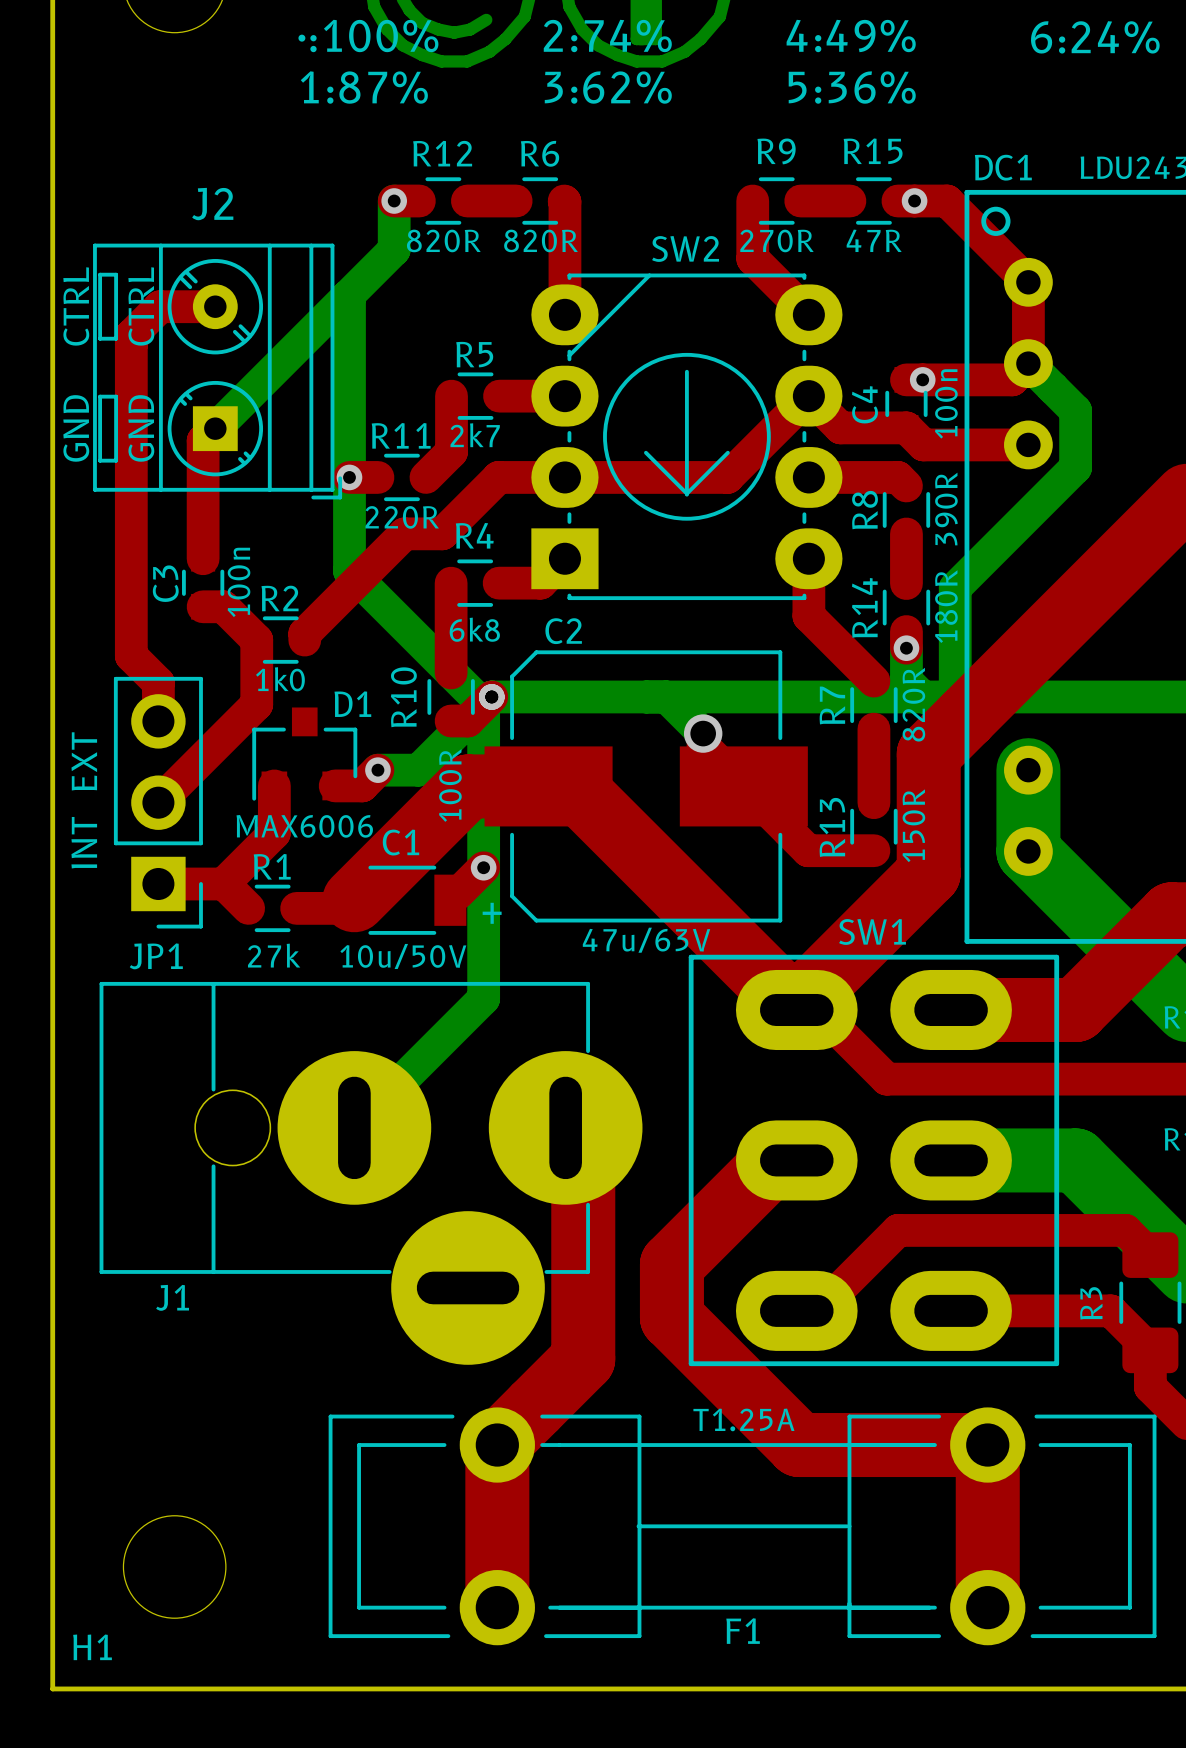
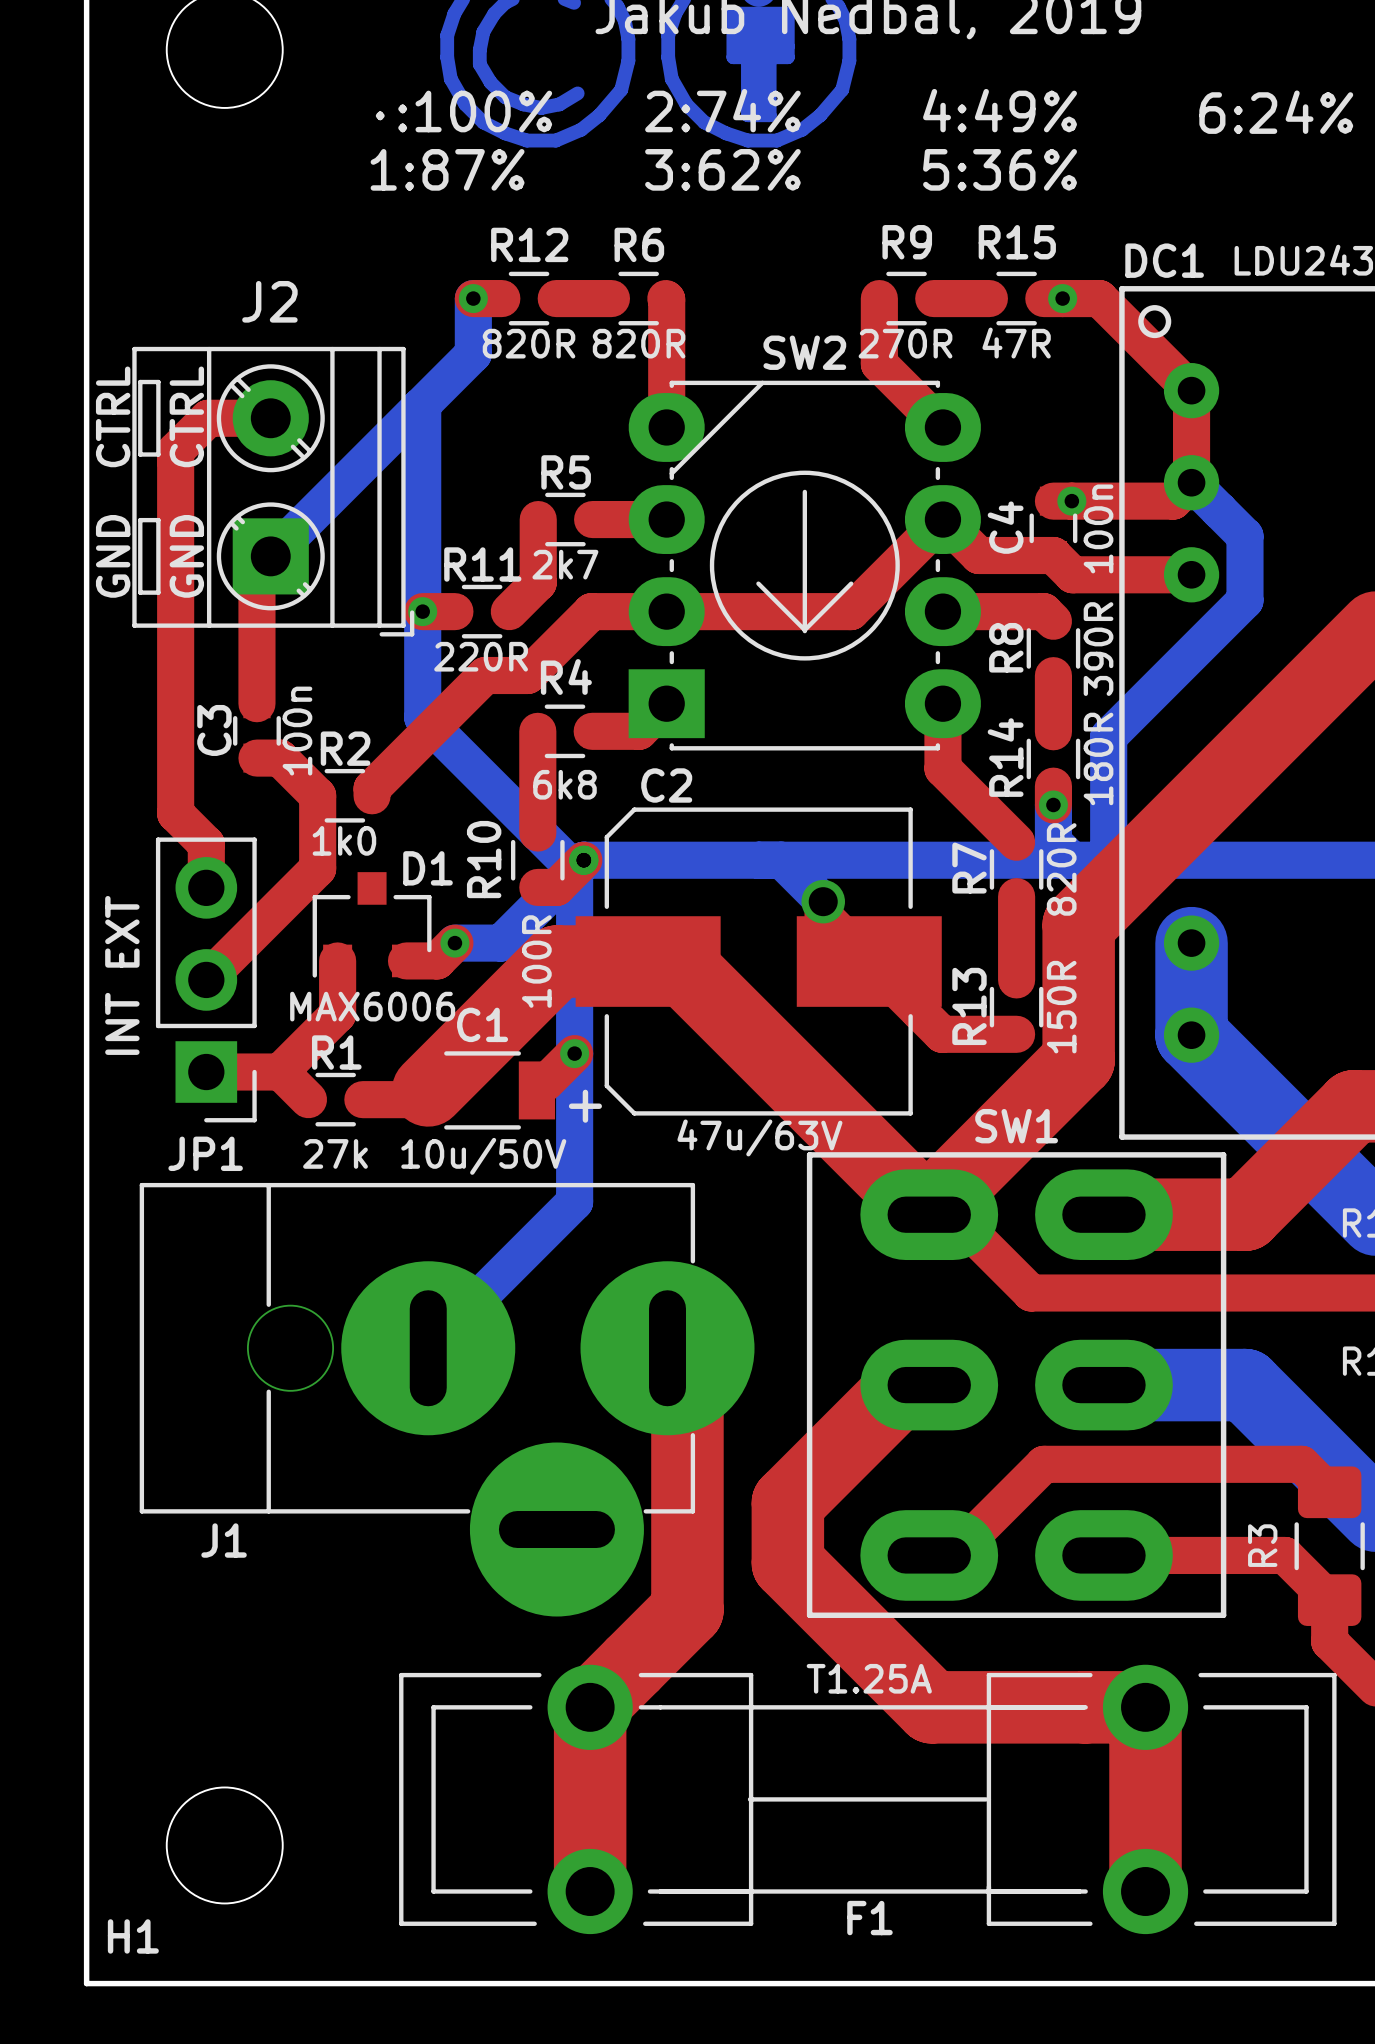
J2 footprint: [93, 243, 343, 500] -> [132, 346, 415, 637]

